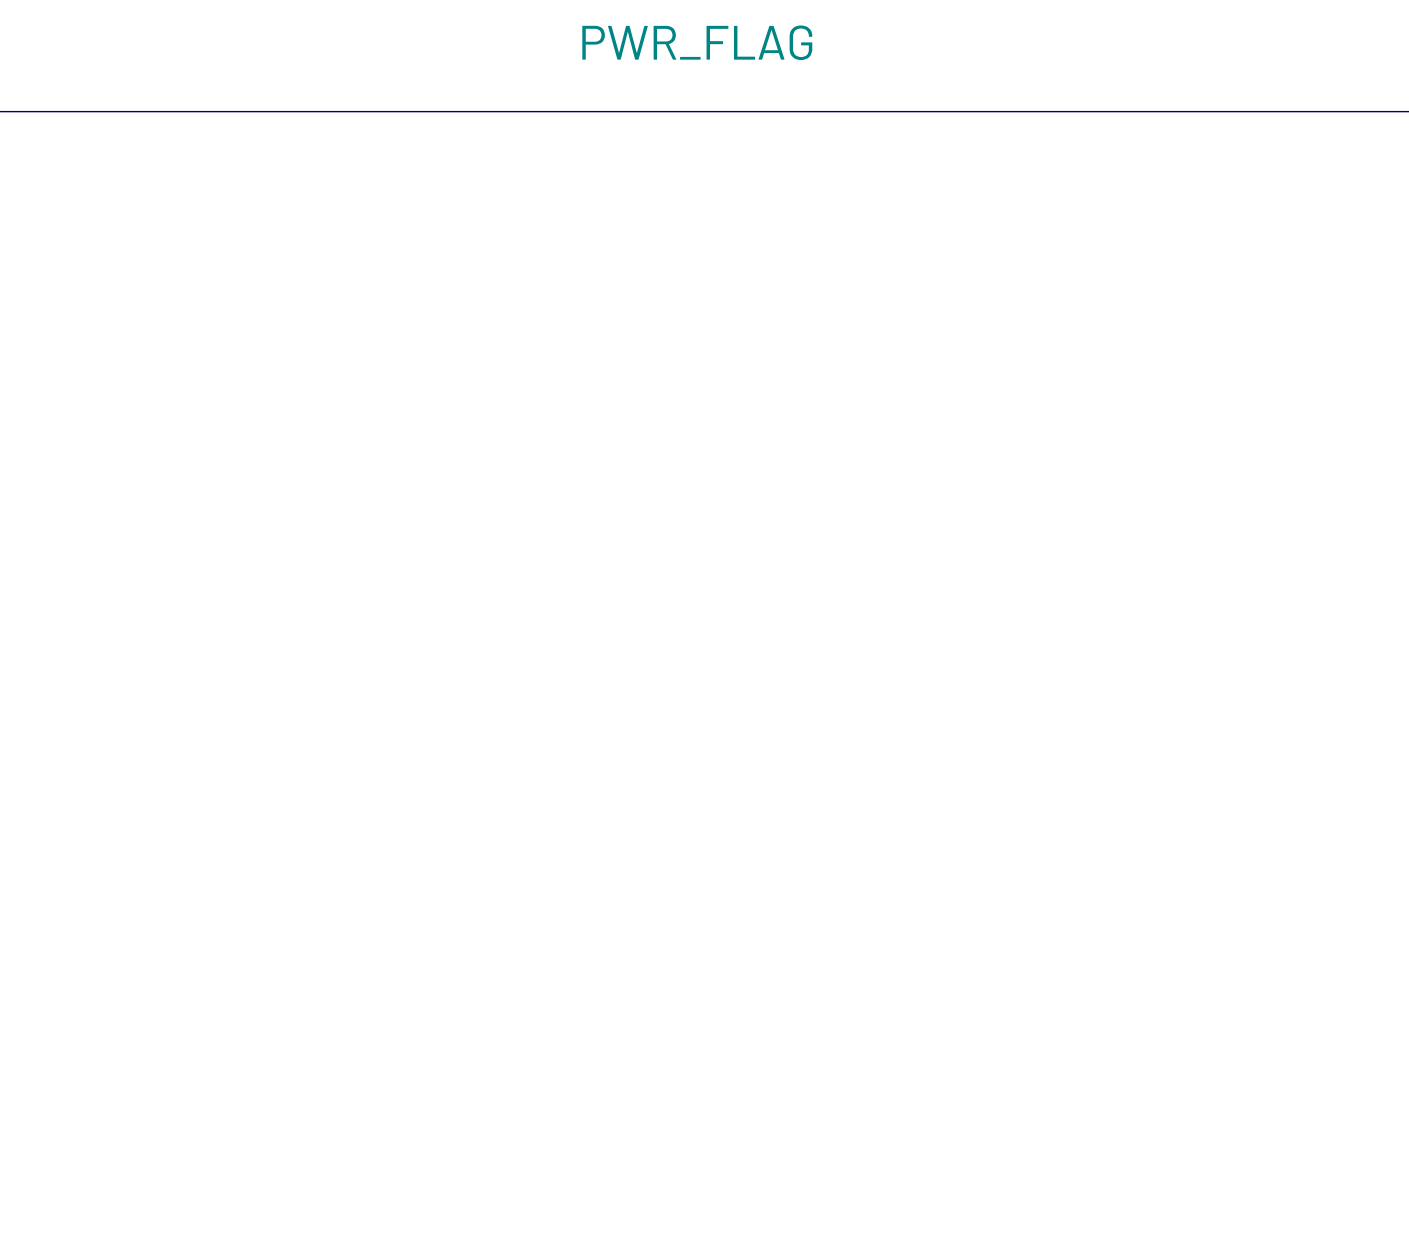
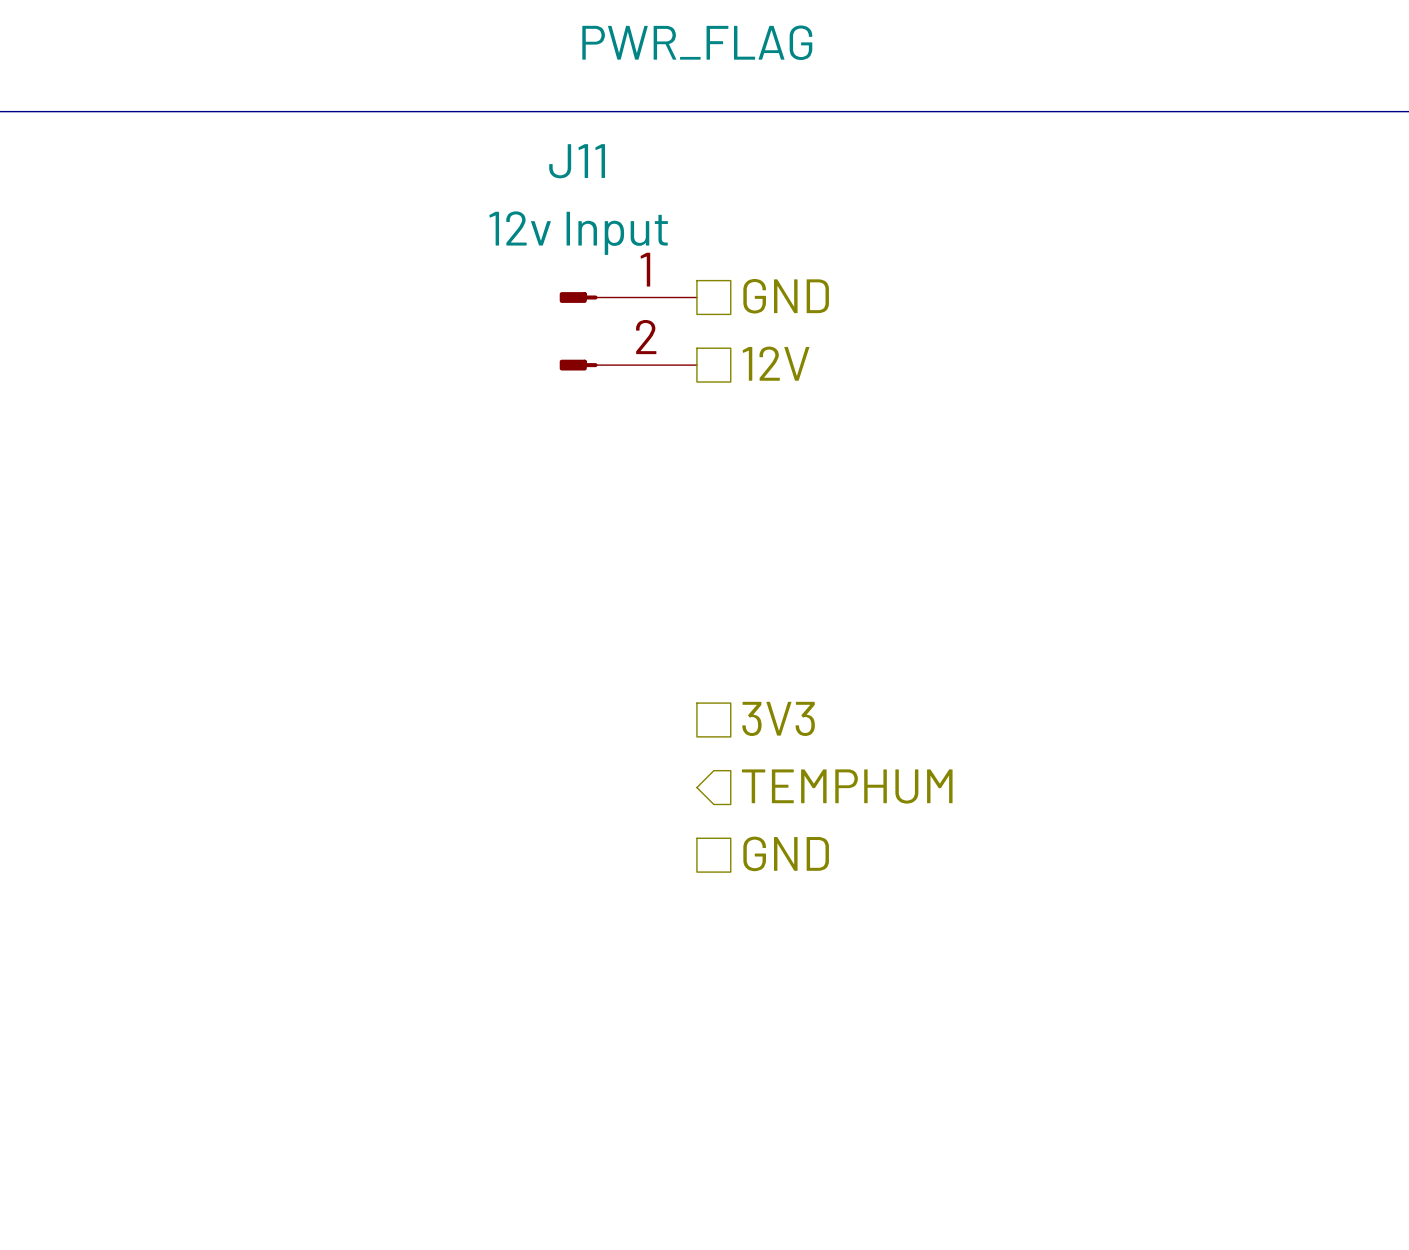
hierarchical label: none -> GND (786, 296)
J11: none -> 12v Input (628, 331)
hierarchical label: none -> 12V (776, 363)
hierarchical label: none -> 3V3 (778, 718)
hierarchical label: none -> TEMPHUM (847, 786)
hierarchical label: none -> GND (786, 853)

